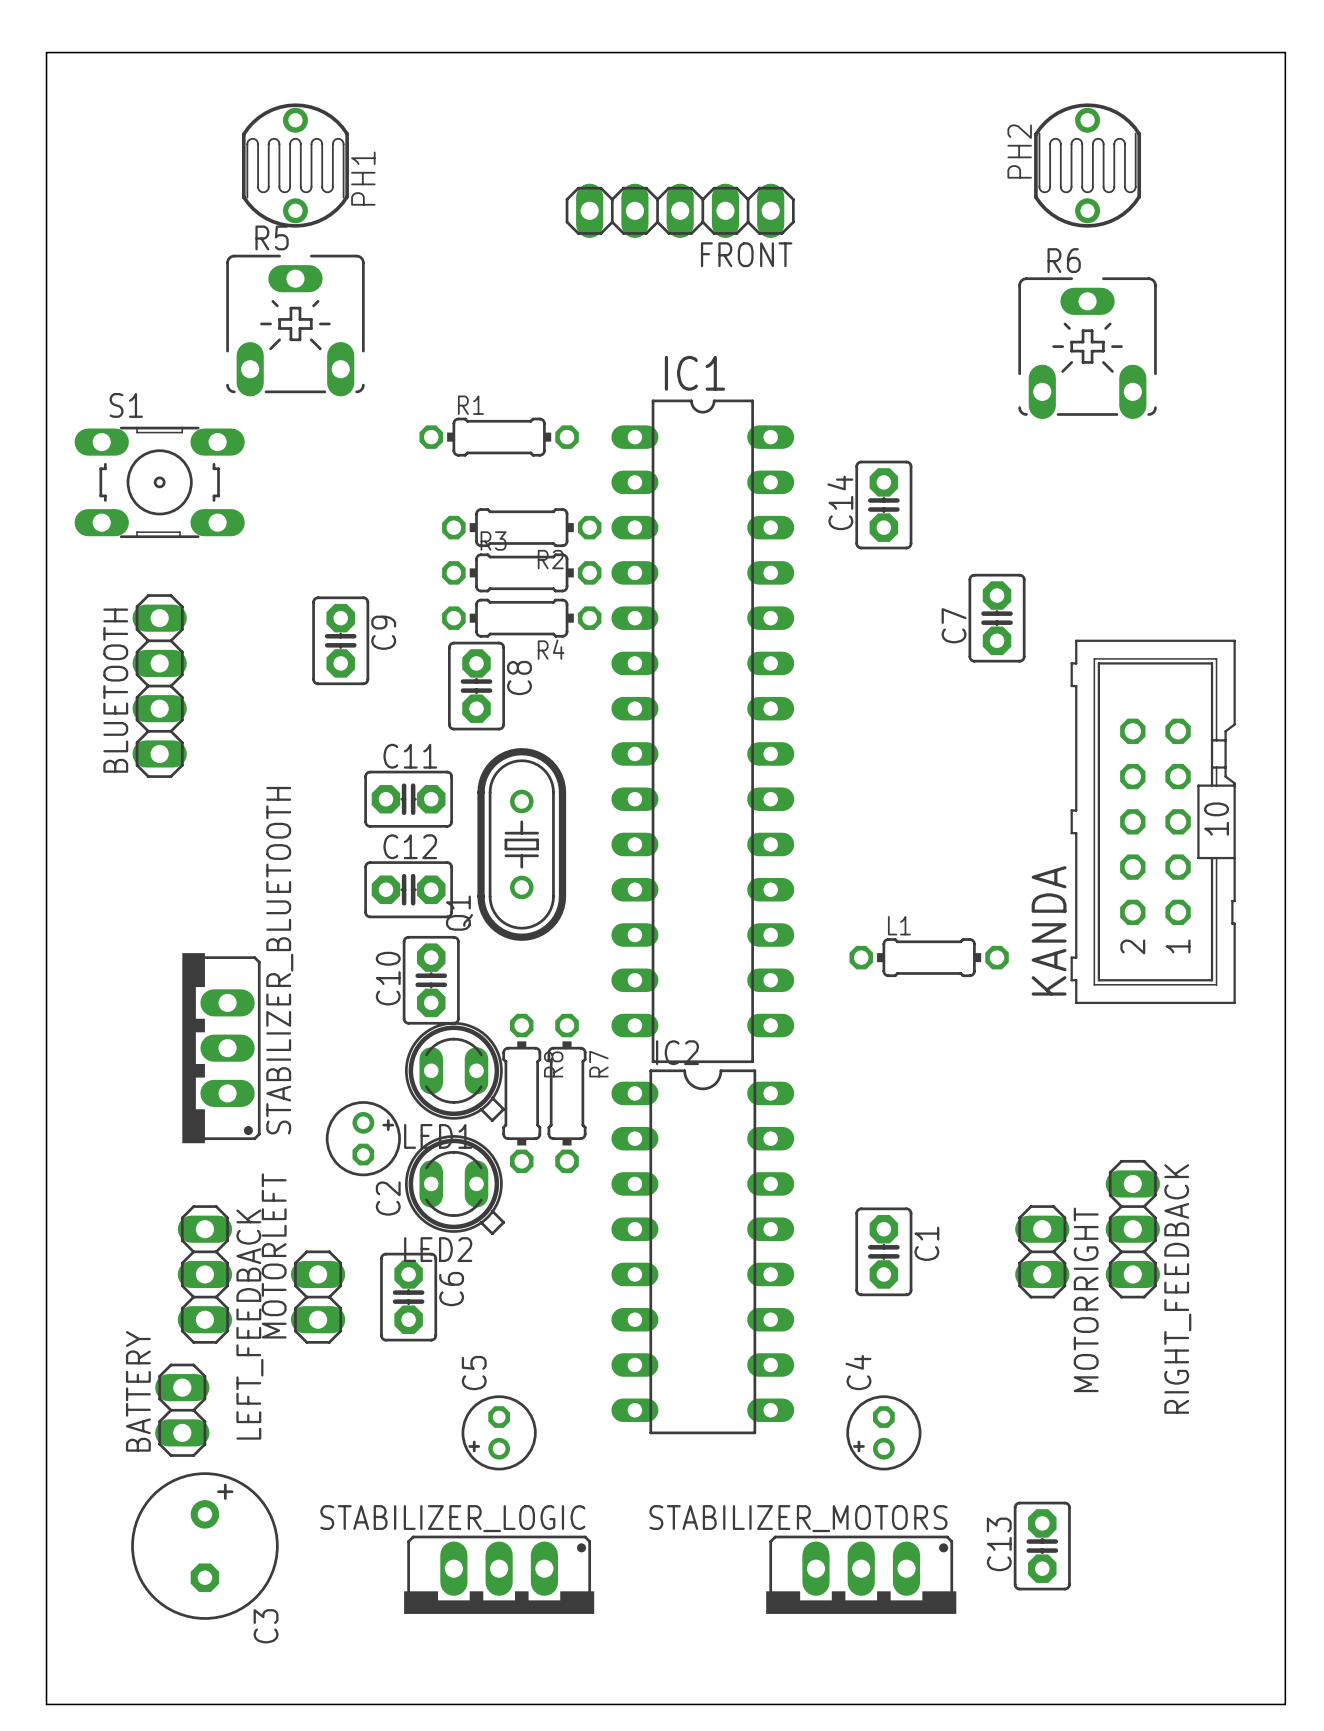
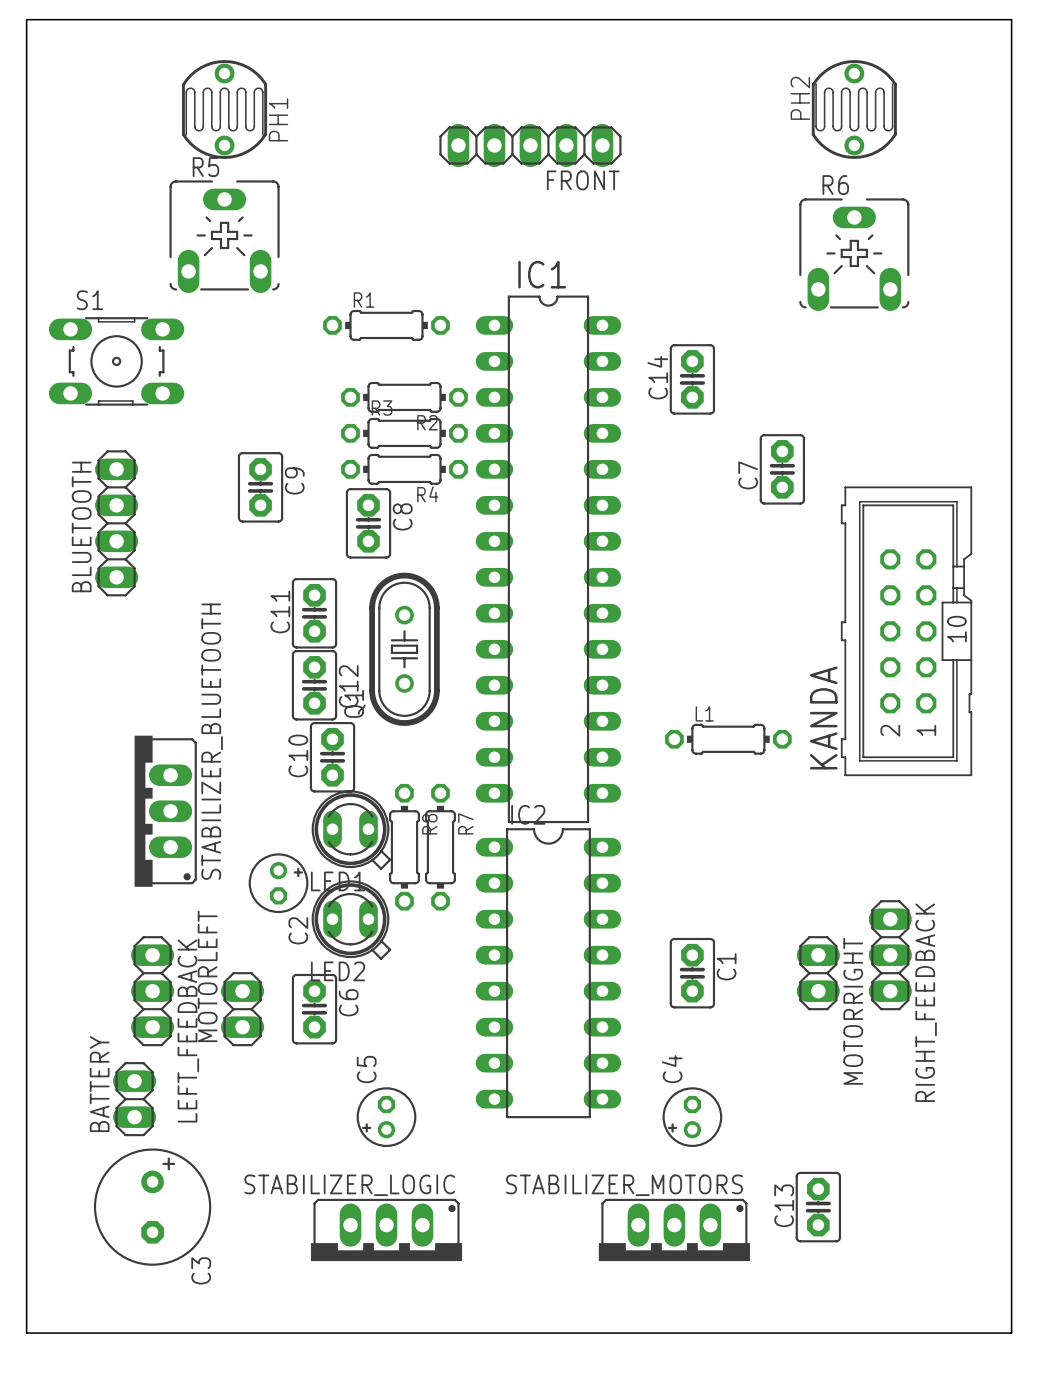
C11 name position: C11 (410, 756) -> C11 (280, 612)
C11 rotation: 0° (408, 799) -> 90° clockwise (314, 613)
C12 rotation: 0° (408, 889) -> 90° clockwise (314, 685)

